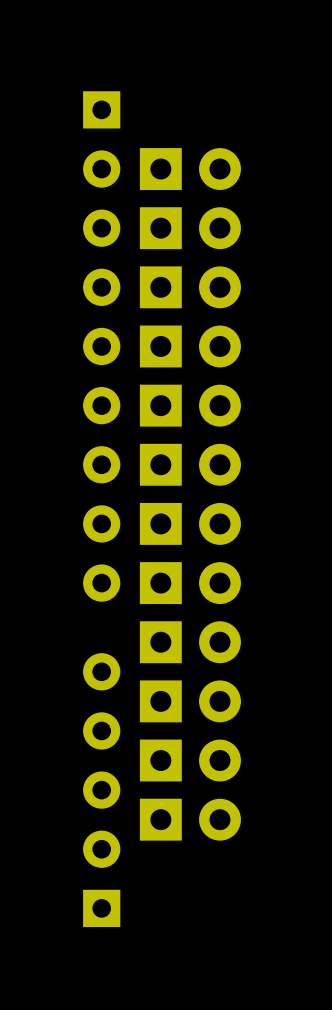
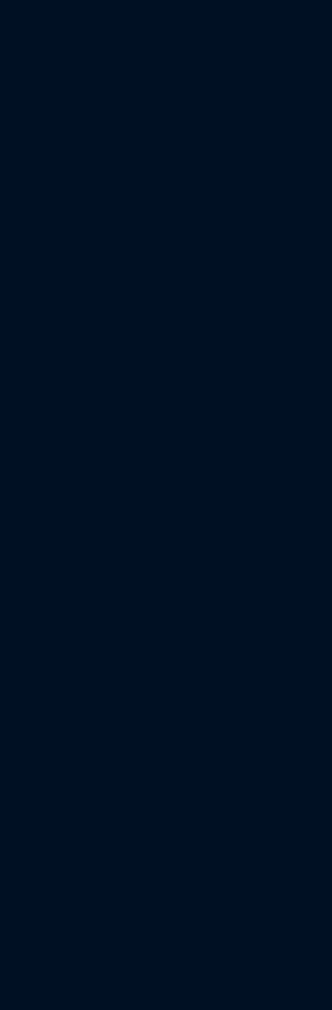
part: (190, 169) -> none
part: (190, 228) -> none
part: (190, 287) -> none
part: (101, 346) -> none
part: (190, 346) -> none
part: (190, 405) -> none
part: (190, 464) -> none
part: (190, 523) -> none
part: (190, 583) -> none
part: (190, 642) -> none
part: (190, 701) -> none
part: (190, 760) -> none
part: (101, 790) -> none
part: (190, 819) -> none

